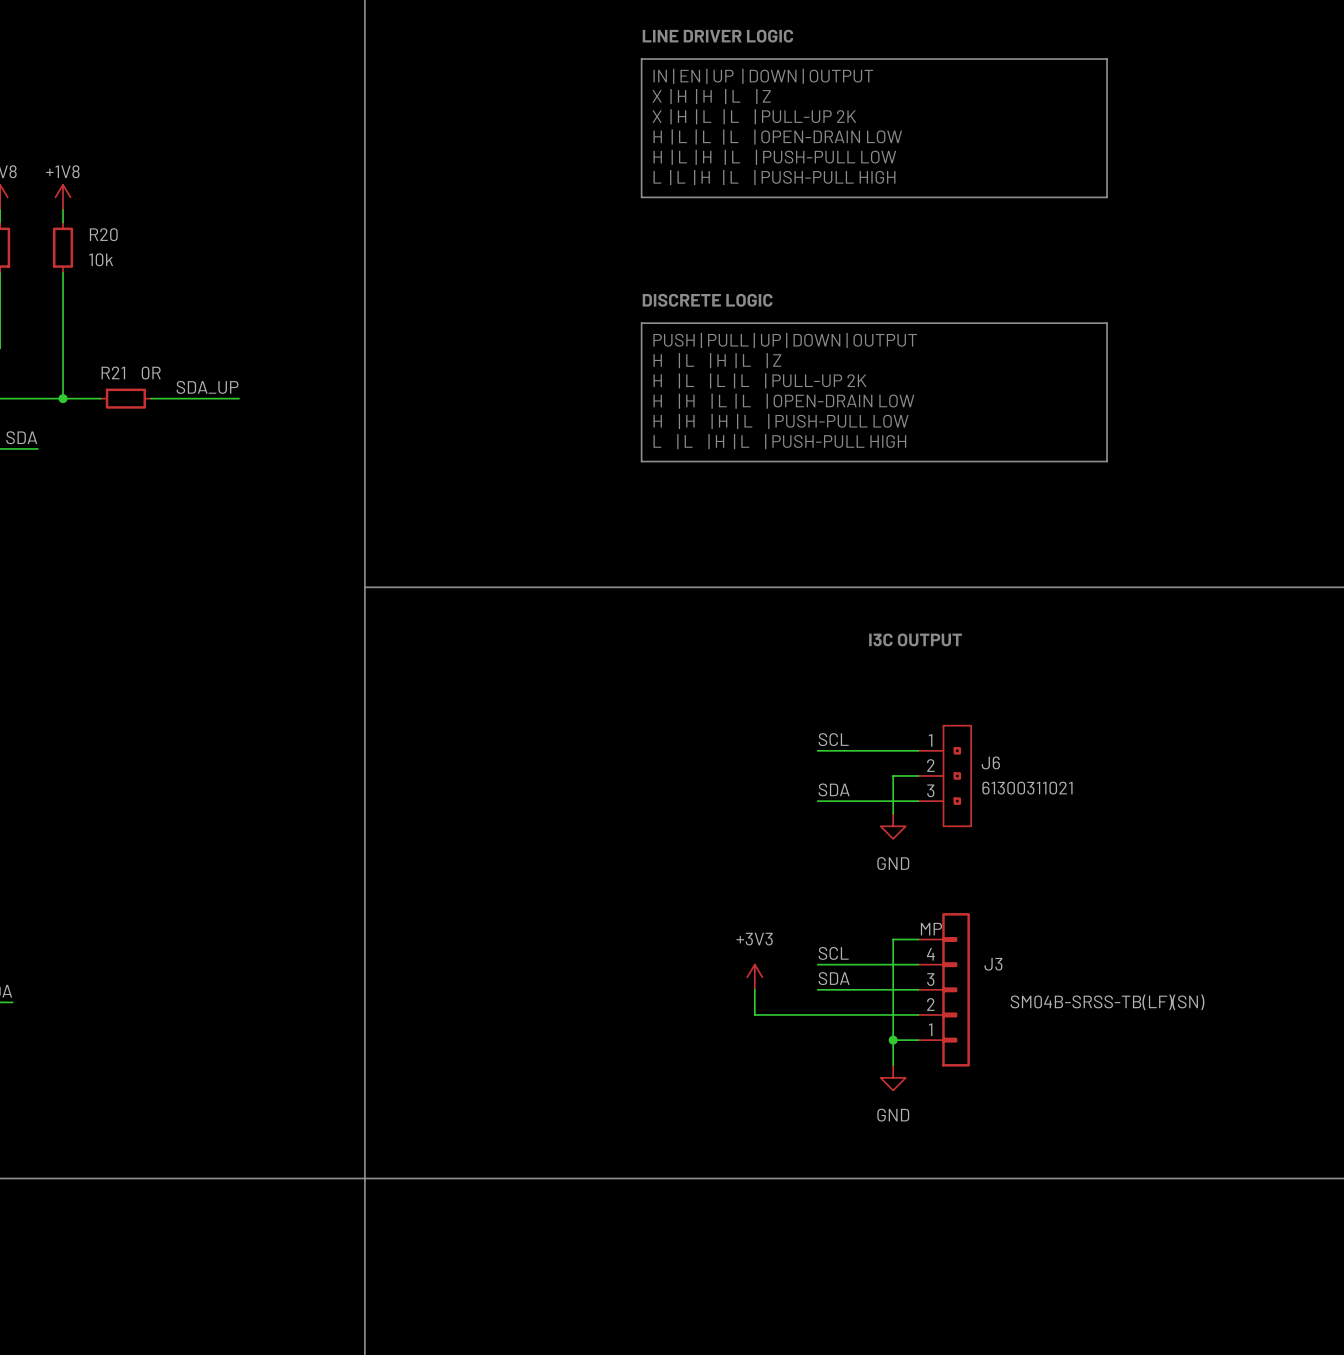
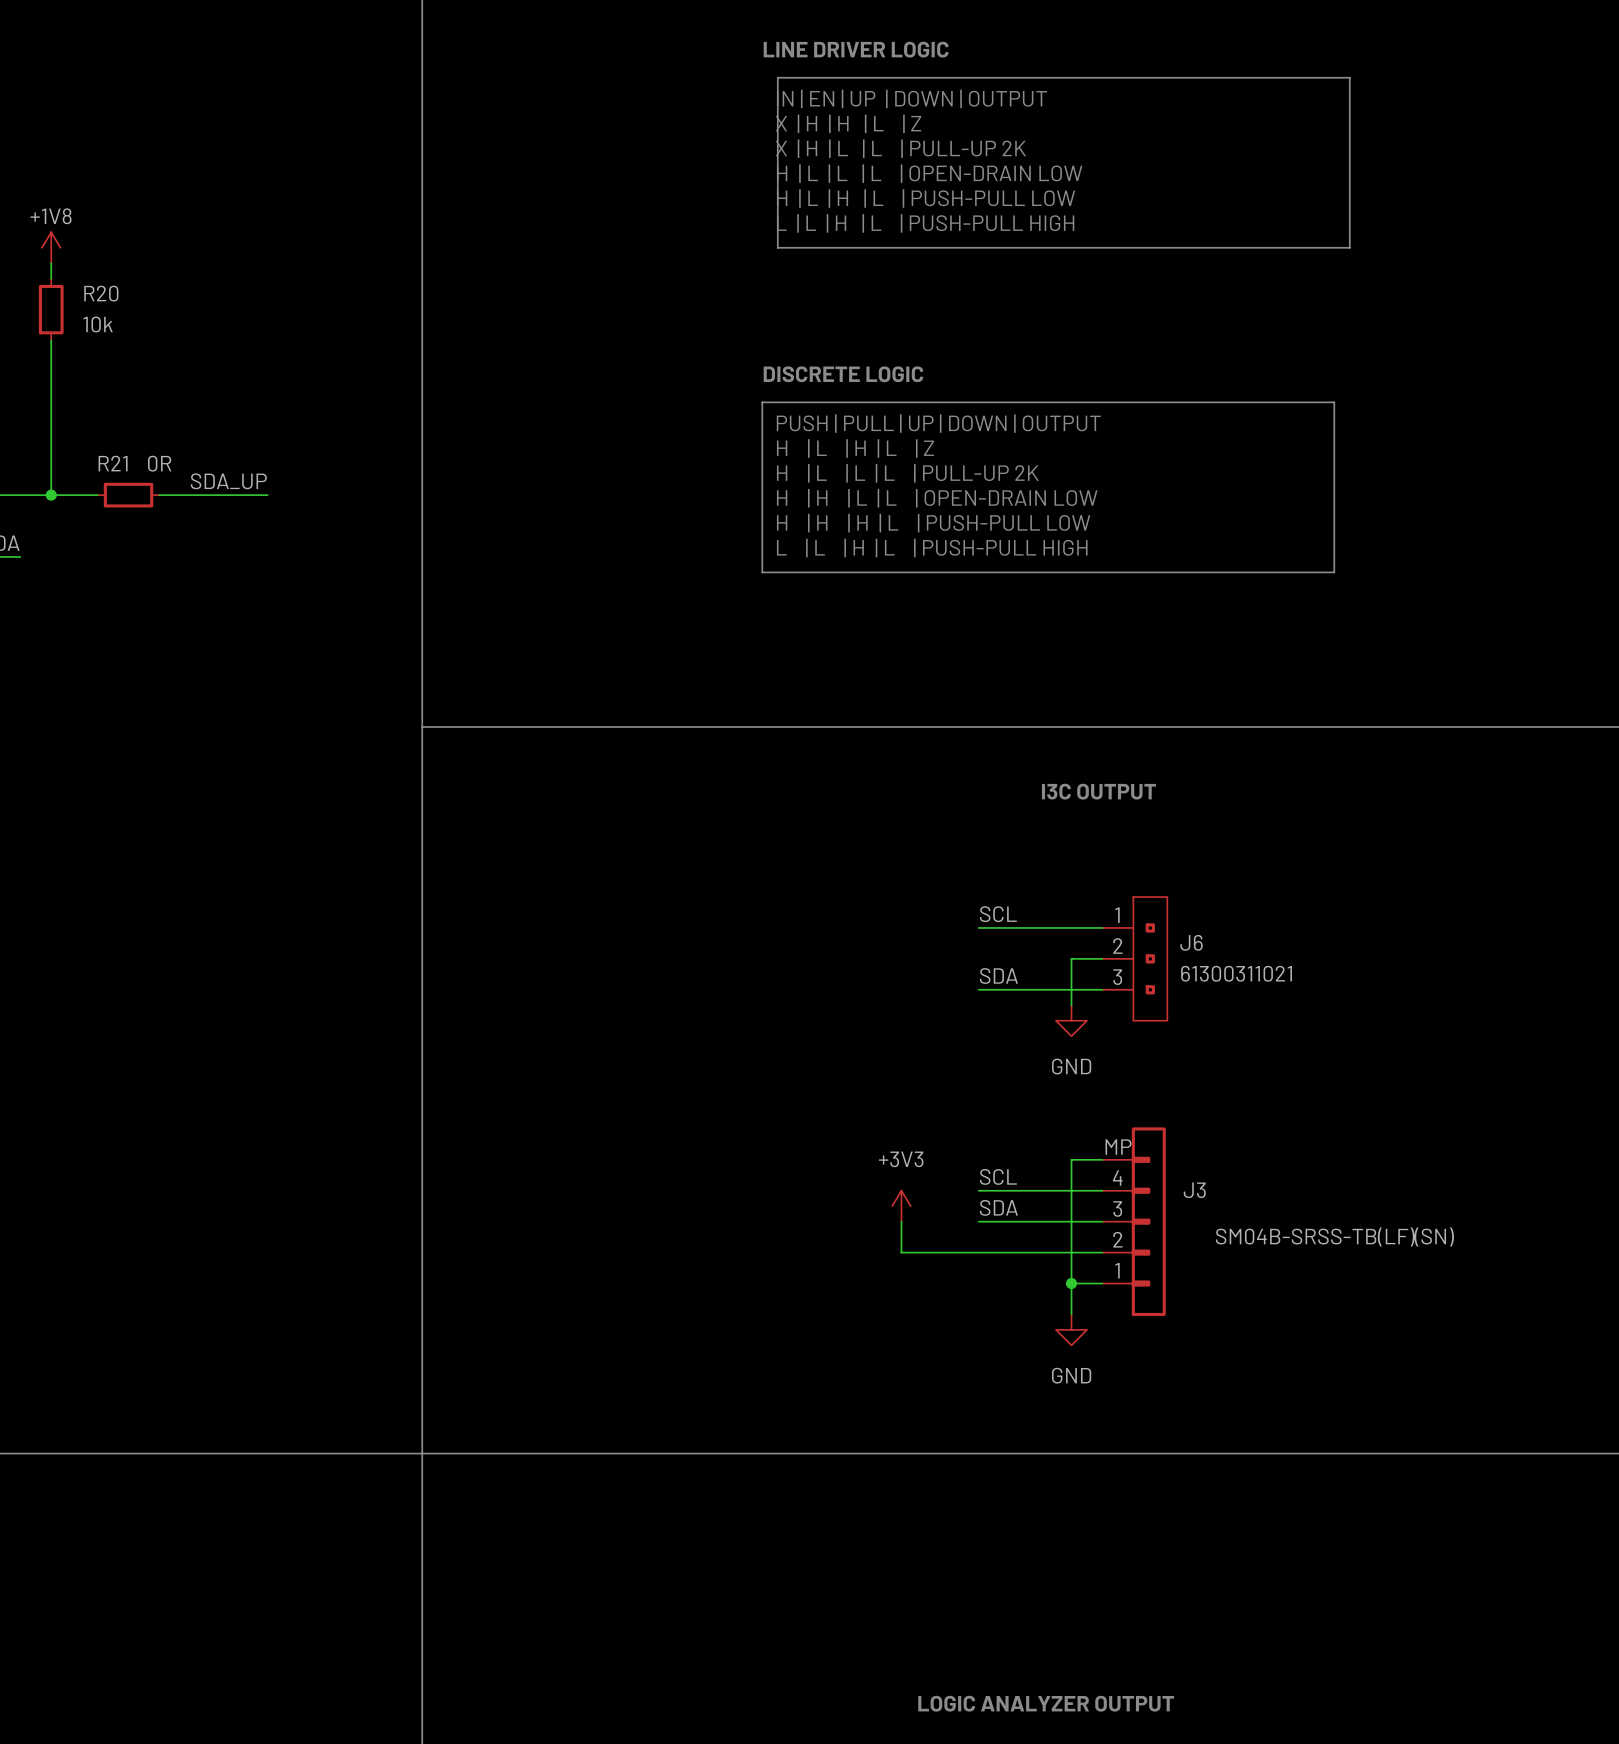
line: (654, 59) (641, 59) (641, 197) (654, 197) -> (777, 77) (777, 247)
line: (1107, 59) (1107, 197) -> (1334, 77) (1349, 77) (1349, 247) (1334, 247)

